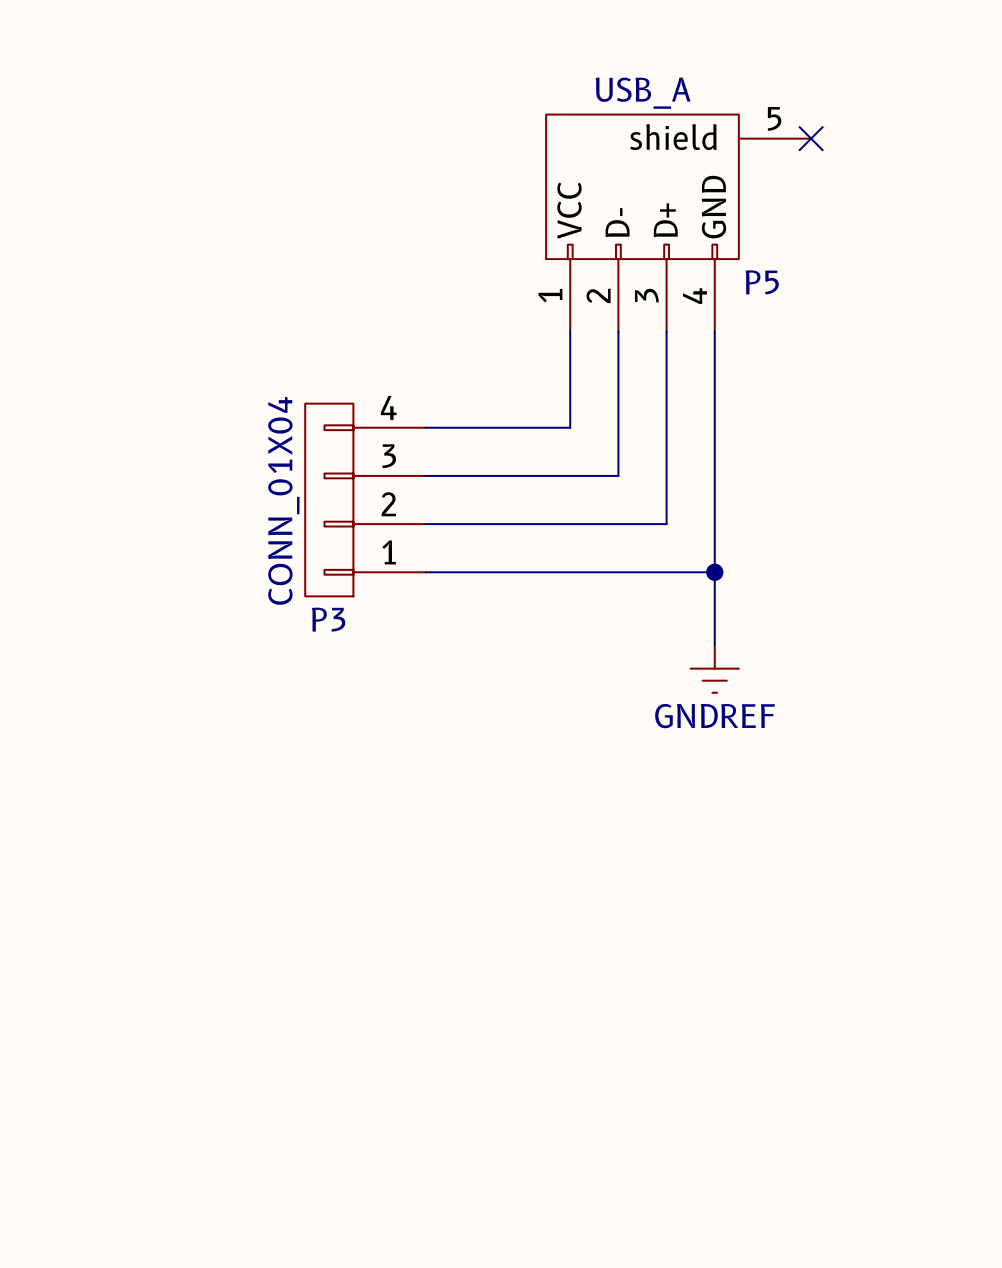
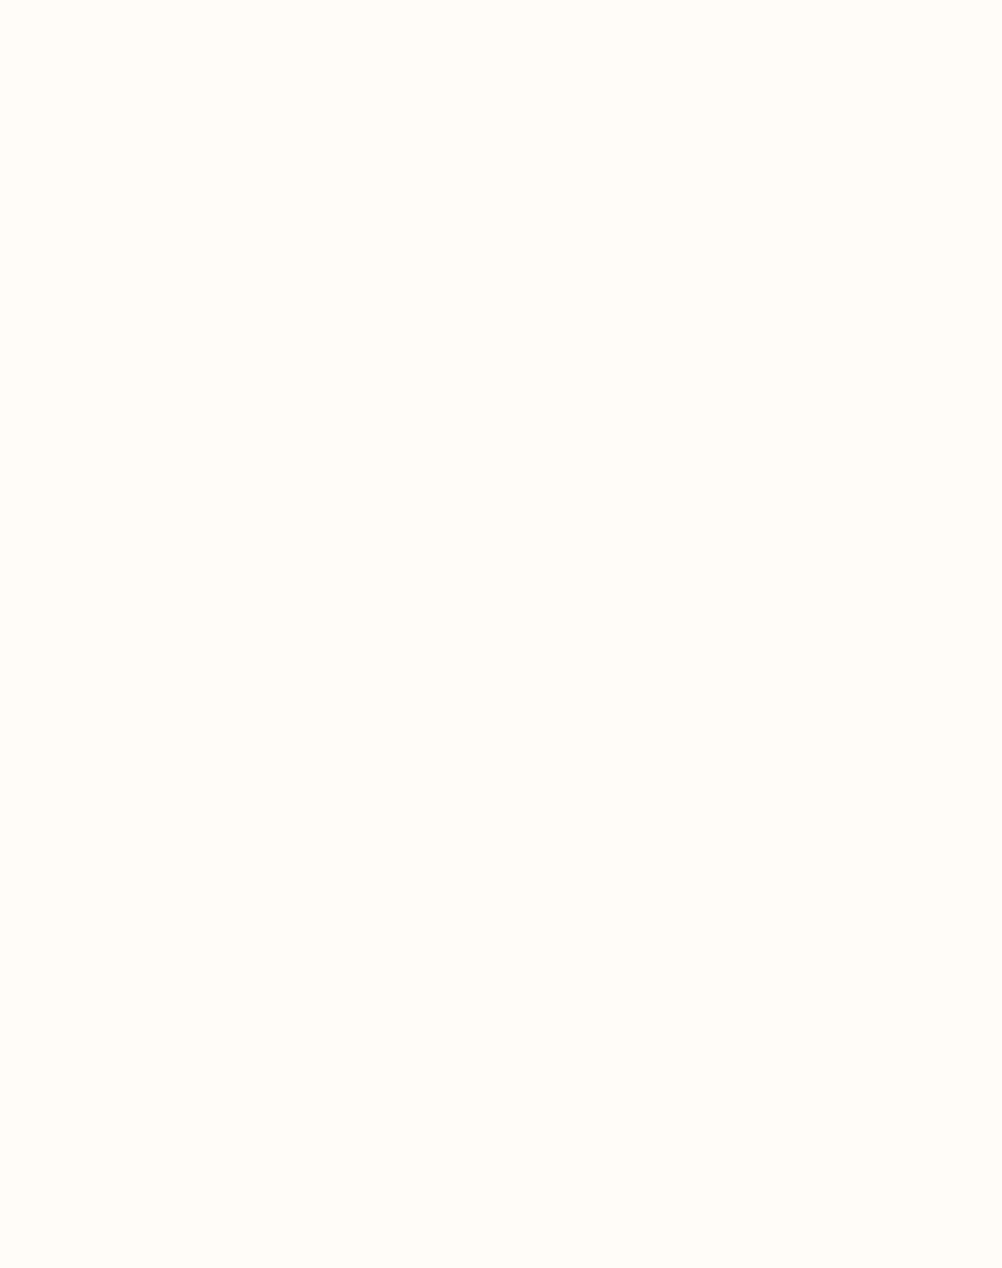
no-connect mark: (811, 138) -> none
P5: USB_A (678, 222) -> none
wire: (570, 331) (570, 427) (425, 427) -> none
wire: (618, 331) (618, 475) (425, 475) -> none
wire: (666, 331) (666, 524) (425, 524) -> none
wire: (714, 331) (714, 644) -> none
P3: CONN_01X04 (365, 500) -> none
wire: (425, 572) (714, 572) -> none
junction: (714, 572) -> none
power symbol: GNDREF (714, 668) -> none

